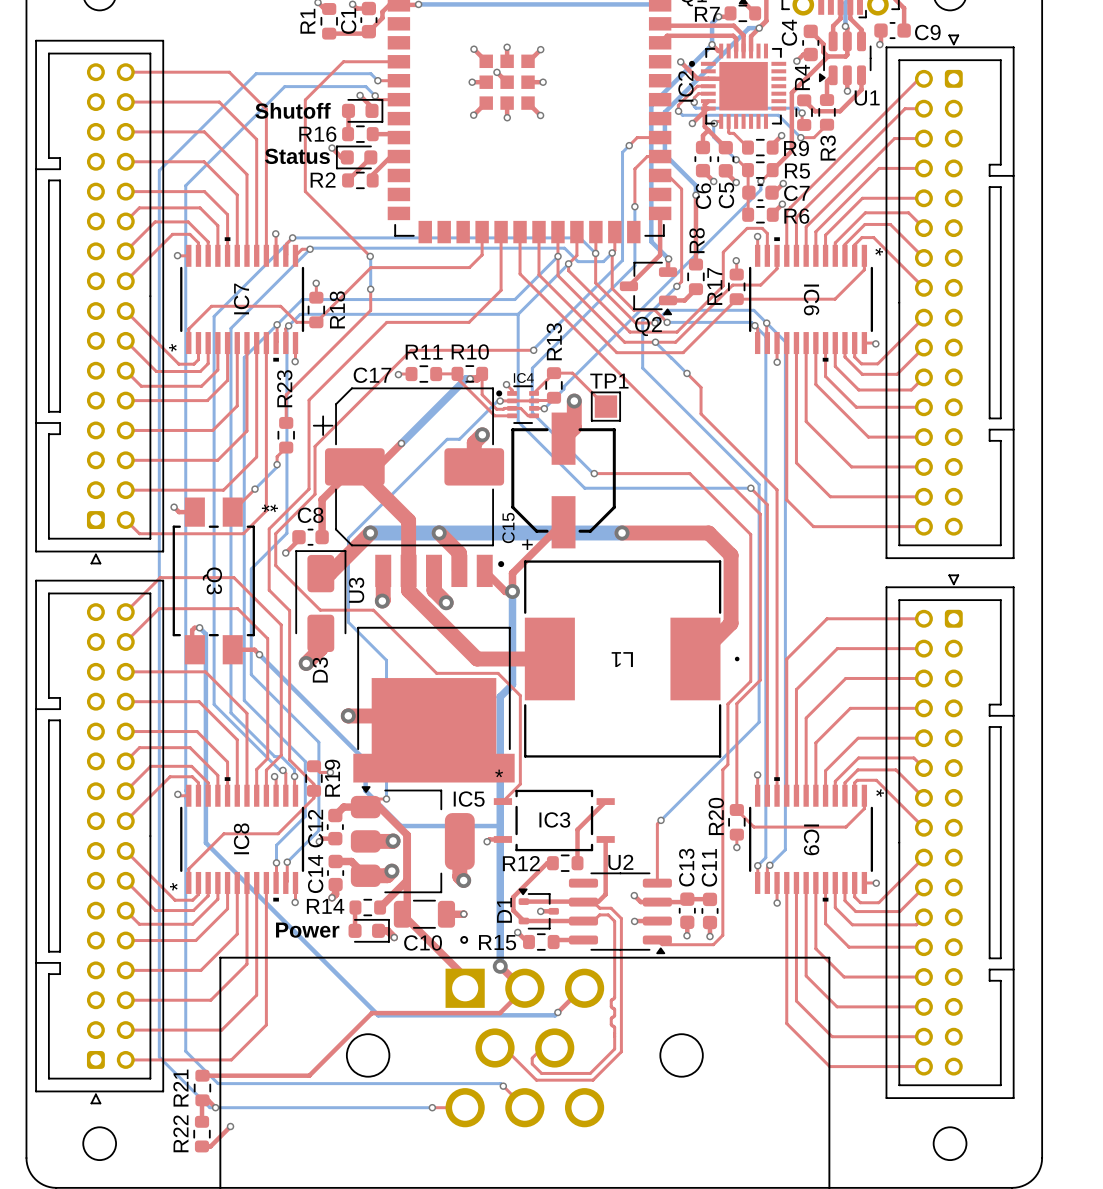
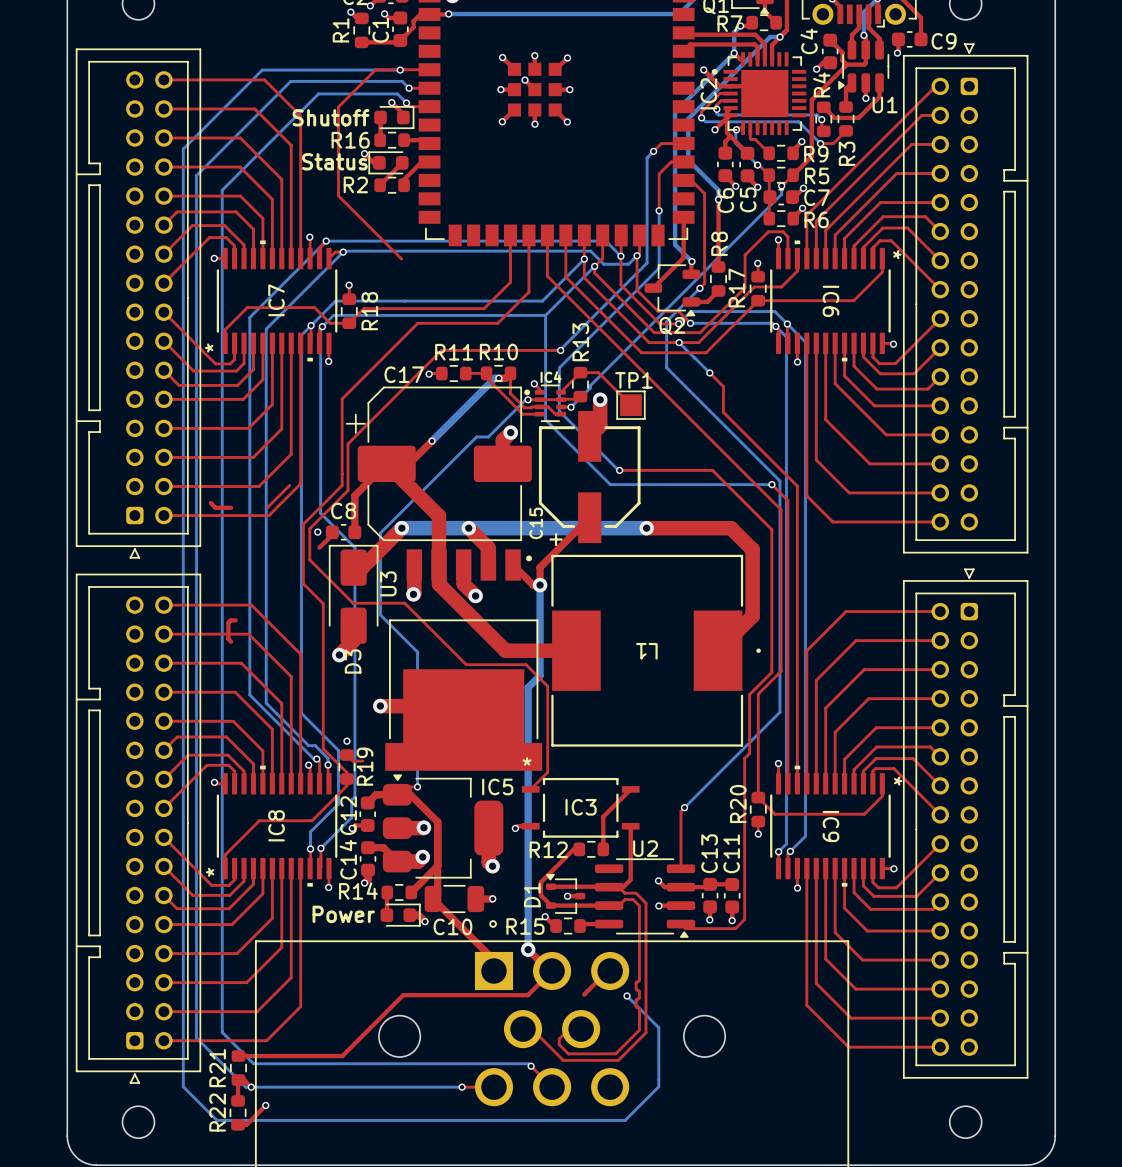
bottom track: none -> (400, 70) (262, 70) (183, 149) (183, 1086) (217, 1120) (625, 1120) (658, 1086) (658, 1027) (627, 996)
via: none -> (400, 70)
top track: (482, 254) (469, 267) (371, 267) (331, 307) -> (510, 257) (510, 282) (484, 308) (363, 308)
bottom track: (370, 256) (370, 289) -> none
via: (370, 256) -> none
top track: (370, 289) (370, 310) (286, 394) (286, 422) -> none
via: (370, 289) -> none
bottom track: (267, 334) (244, 357) (244, 700) (267, 723) -> (301, 335) (301, 713)
R23: (286, 435) -> none
top track: (286, 447) (277, 456) (277, 464) -> none
bottom track: (277, 464) (277, 467) (255, 489) -> none
via: (277, 464) -> none
top track: (266, 487) (266, 510) (243, 533) (139, 533) (125, 520) -> (300, 483) (268, 515) (163, 515)
via: (255, 489) -> none
via: (174, 507) -> none
bottom track: (286, 517) (286, 533) (251, 568) (251, 674) (318, 742) (318, 812) -> (320, 513) (354, 547) (354, 796) (351, 800)
via position: (285, 553) -> (317, 532)
Q3: (213, 580) -> none
top track: (125, 612) (160, 577) (233, 577) (281, 624) (281, 755) (266, 770) -> (163, 605) (251, 605) (300, 654) (300, 758)
bottom track: (199, 627) (205, 634) (205, 842) (378, 1015) (555, 1015) (557, 1012) -> none
via: (199, 627) -> none
top track: (125, 641) (159, 608) (237, 608) (267, 638) (267, 758) (256, 769) -> (163, 634) (248, 634) (291, 676) (291, 758)
top track: (232, 649) (254, 649) (259, 654) -> none
bottom track: (259, 654) (365, 760) (365, 790) (400, 826) (500, 826) -> none
via: (259, 654) -> none
via position: (330, 772) -> (346, 741)
via position: (557, 1012) -> (627, 996)

